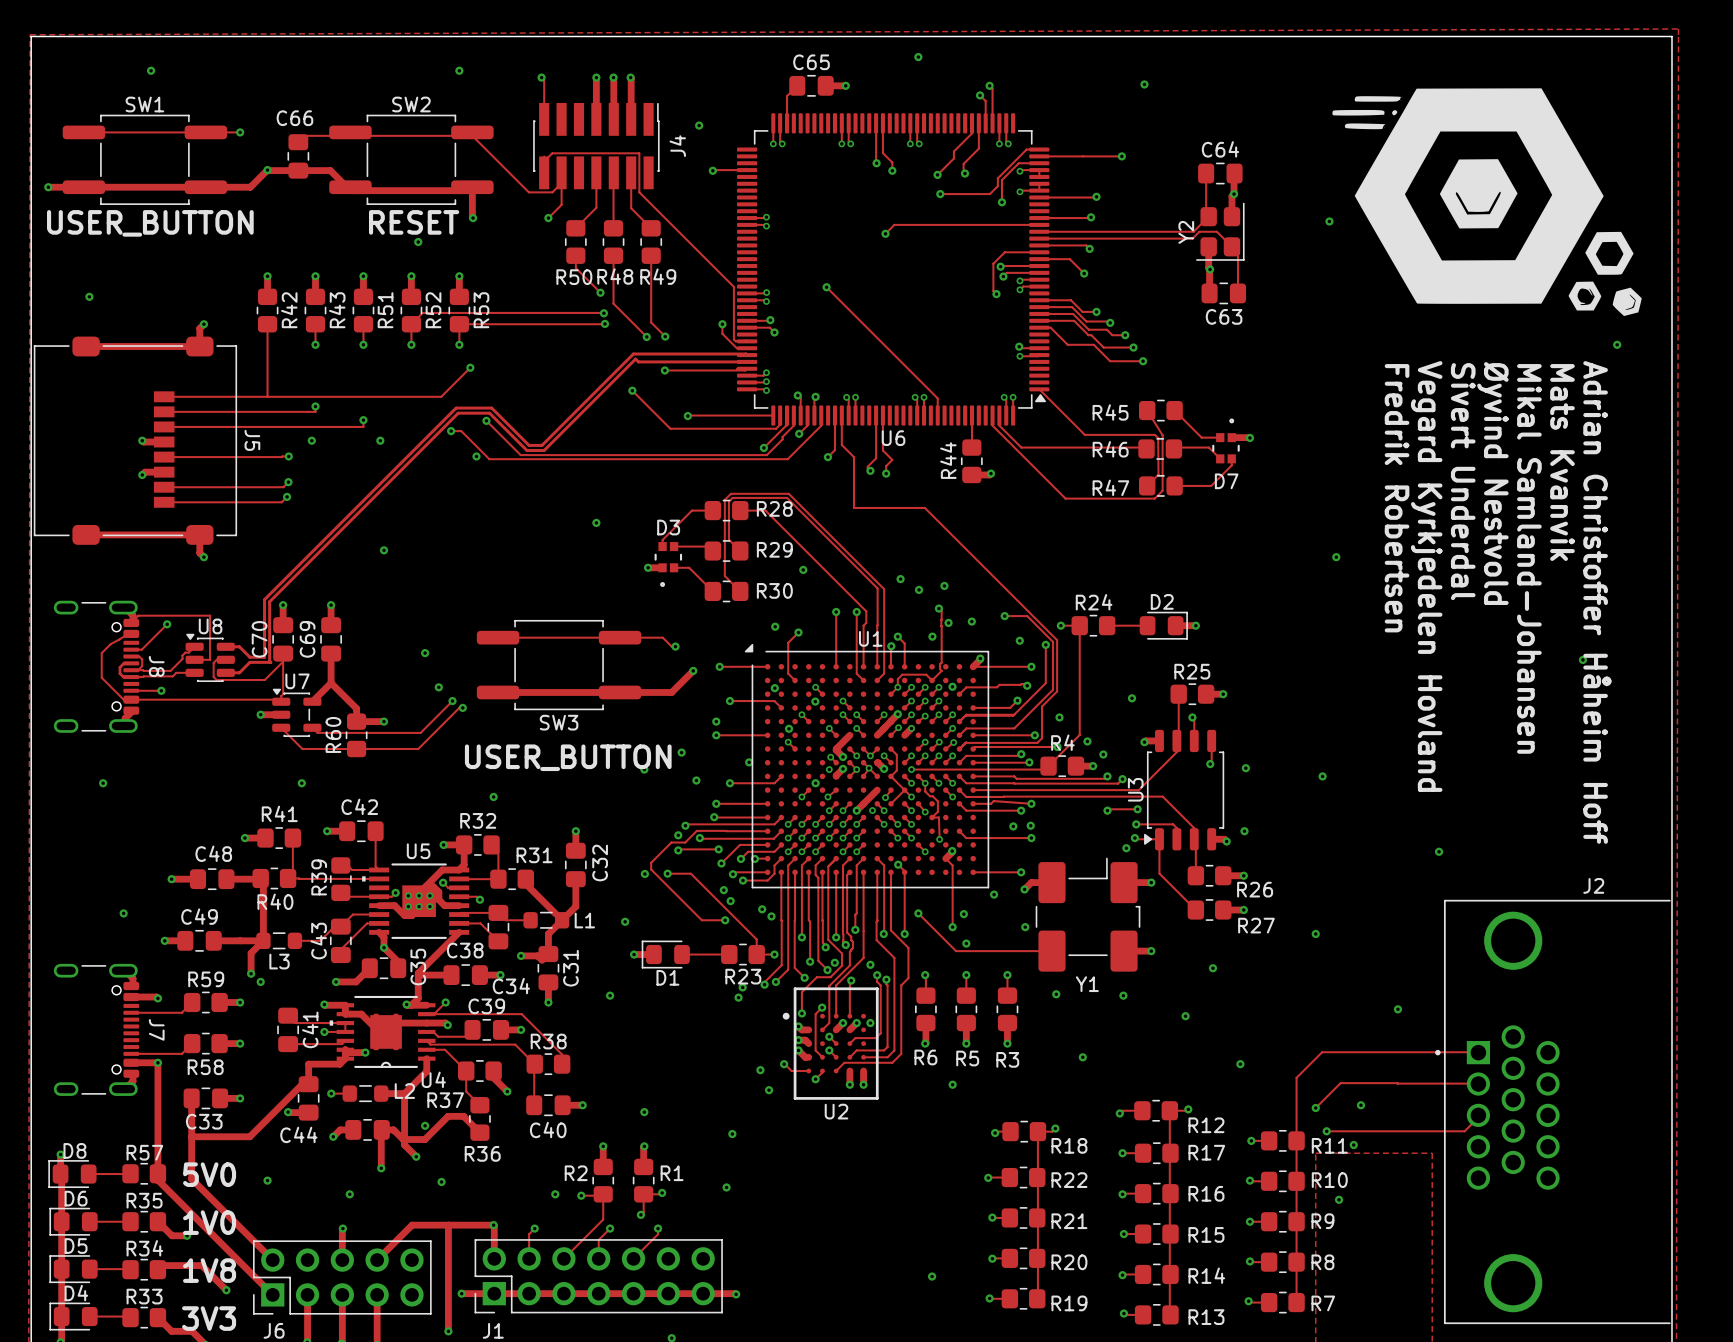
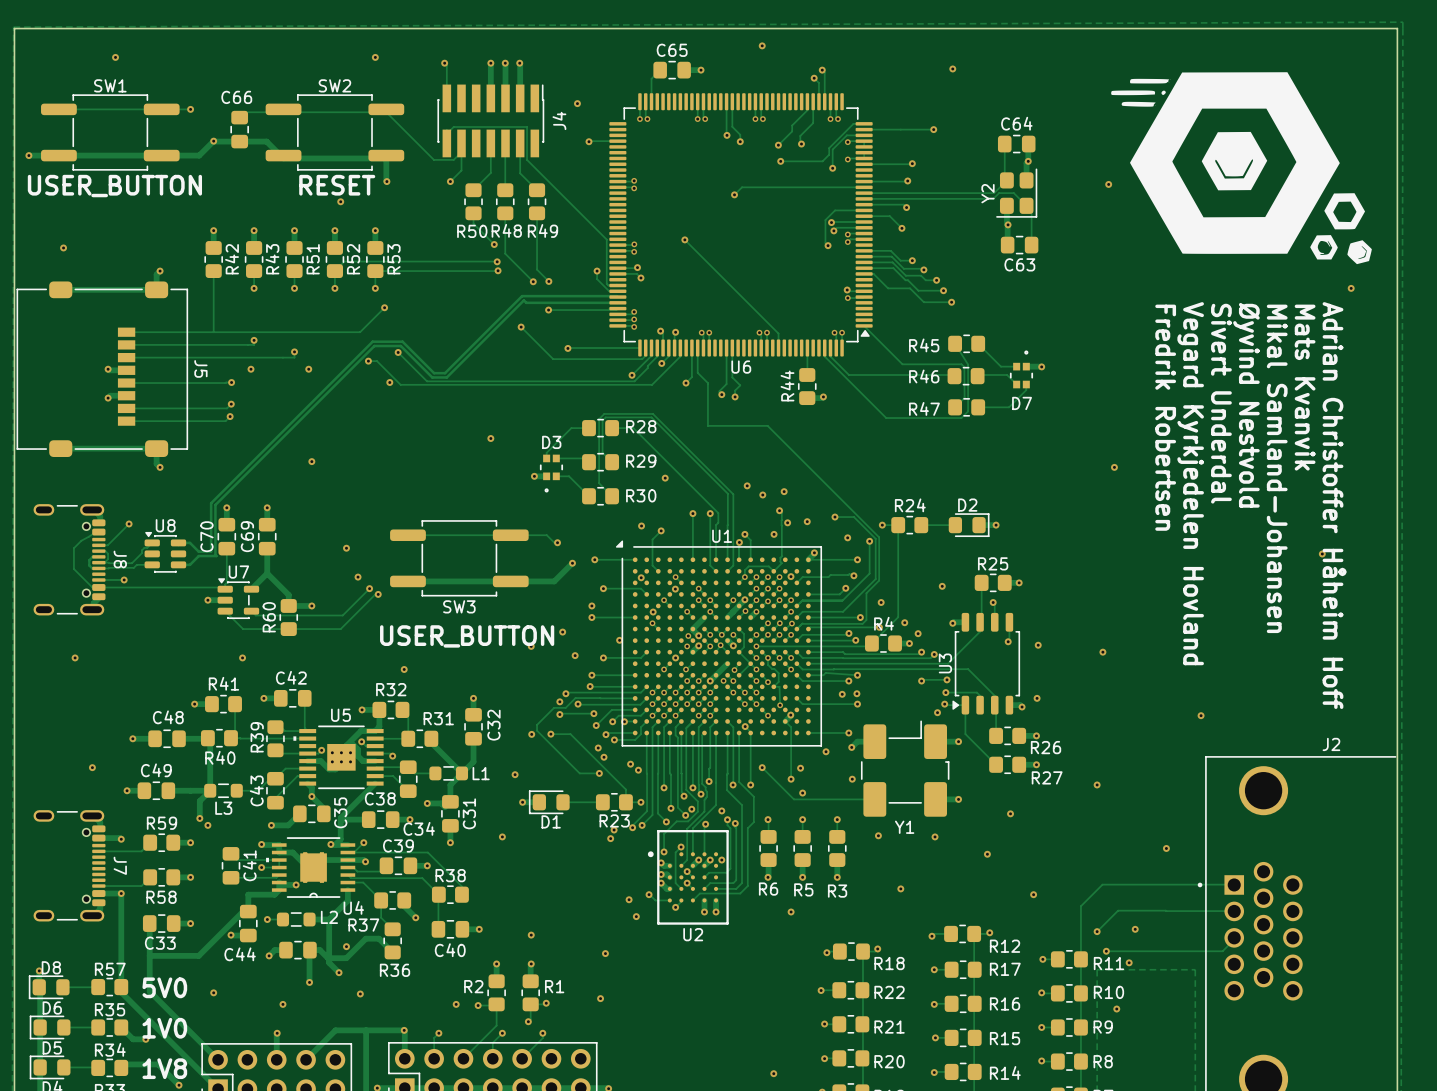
track: (209, 615) (209, 659) (194, 659) -> none
track: (210, 615) (138, 615) (131, 622) -> none
track: (225, 659) (216, 659) (213, 662) (213, 677) (216, 680) (264, 680) (283, 661) -> none

